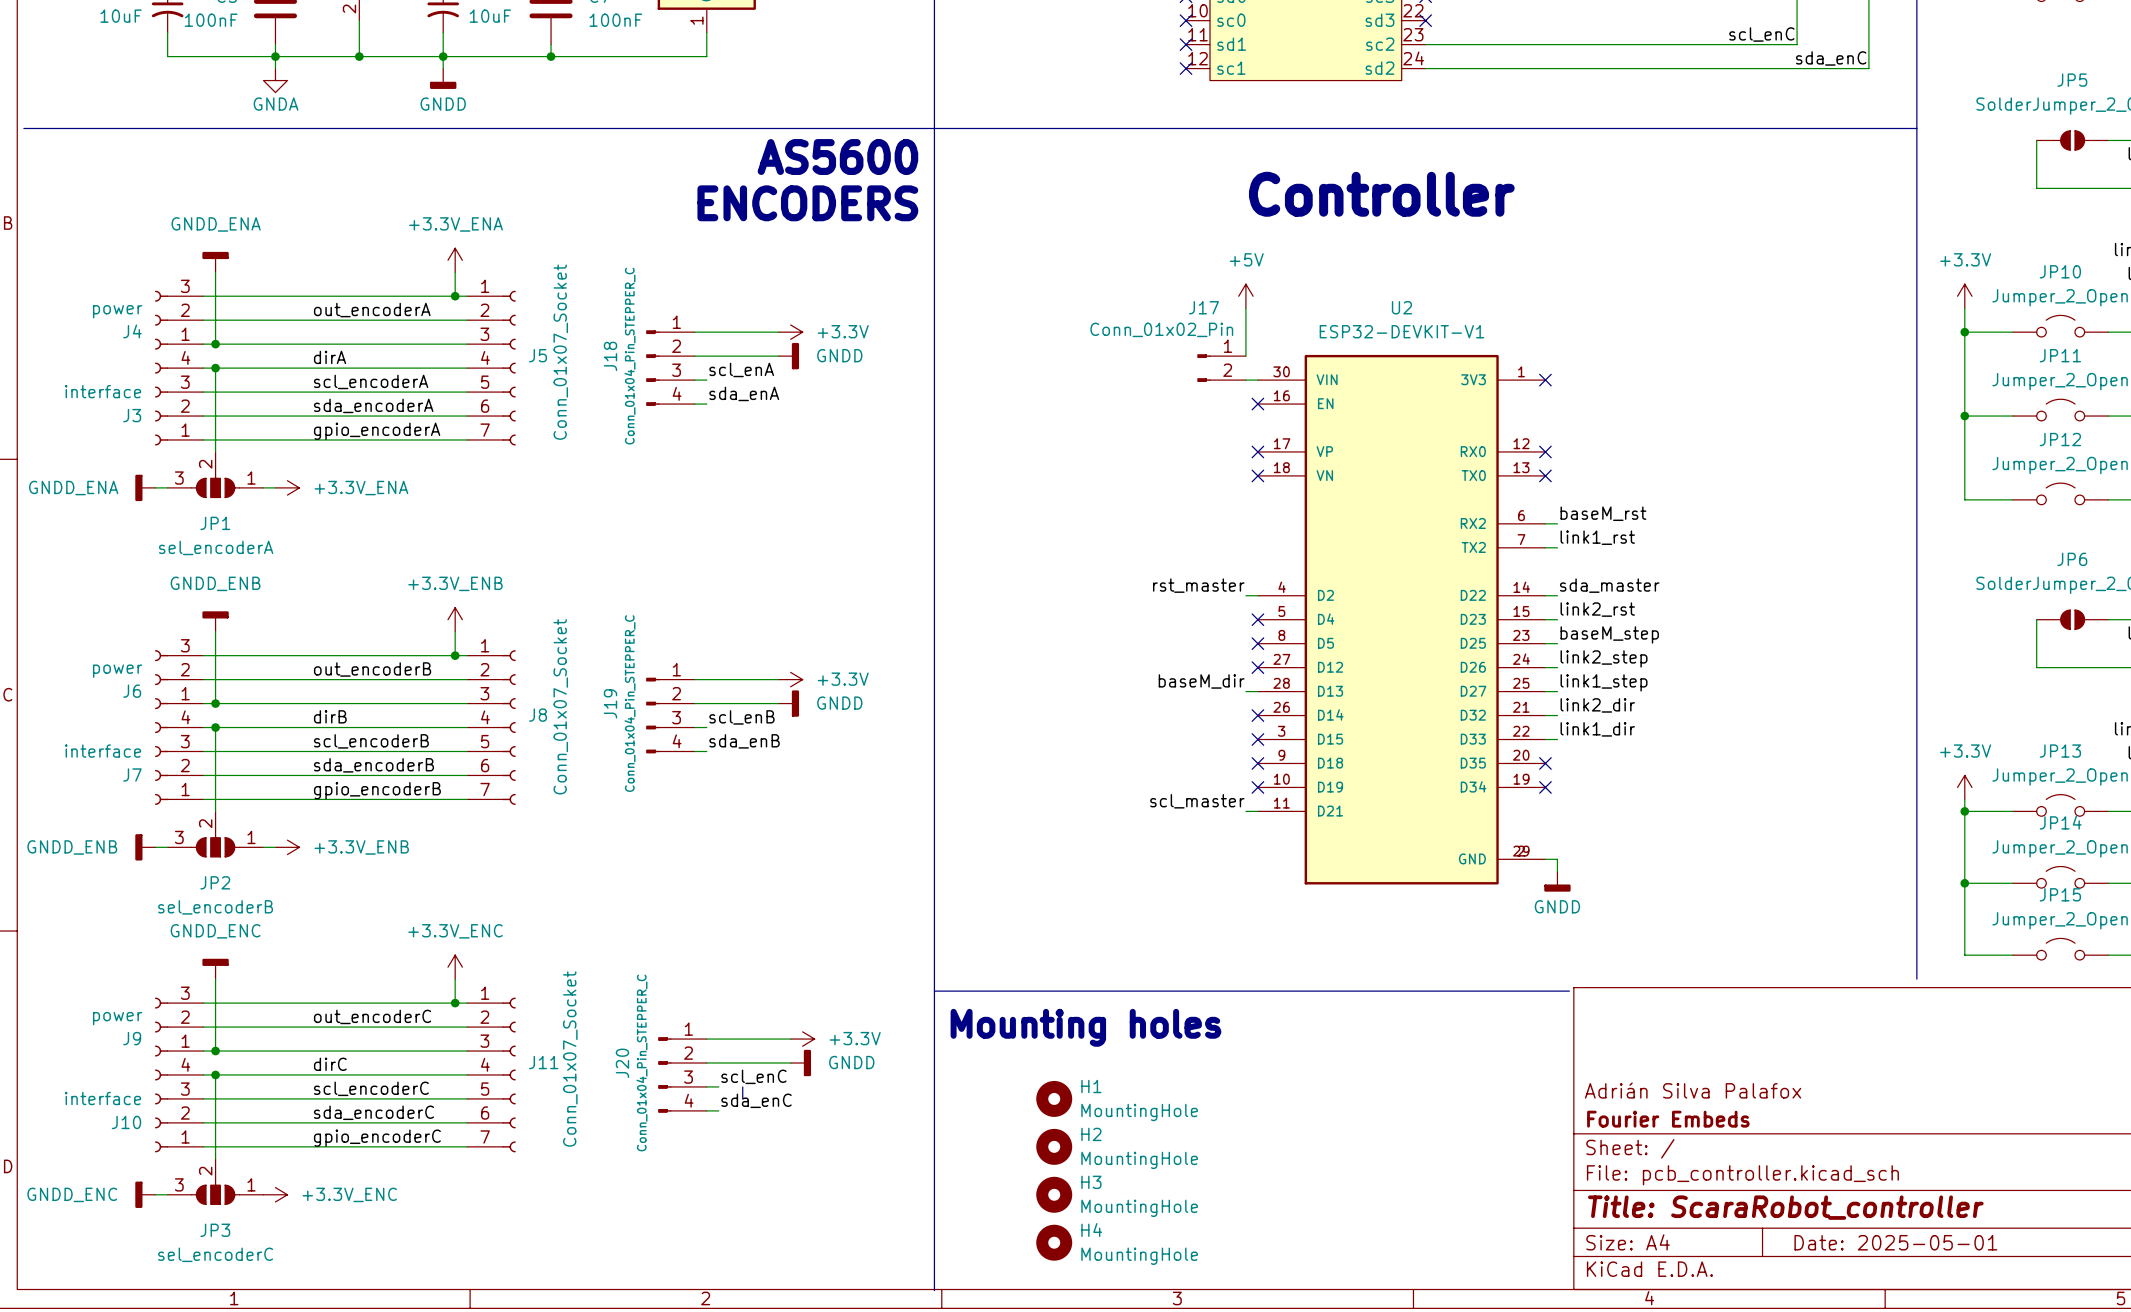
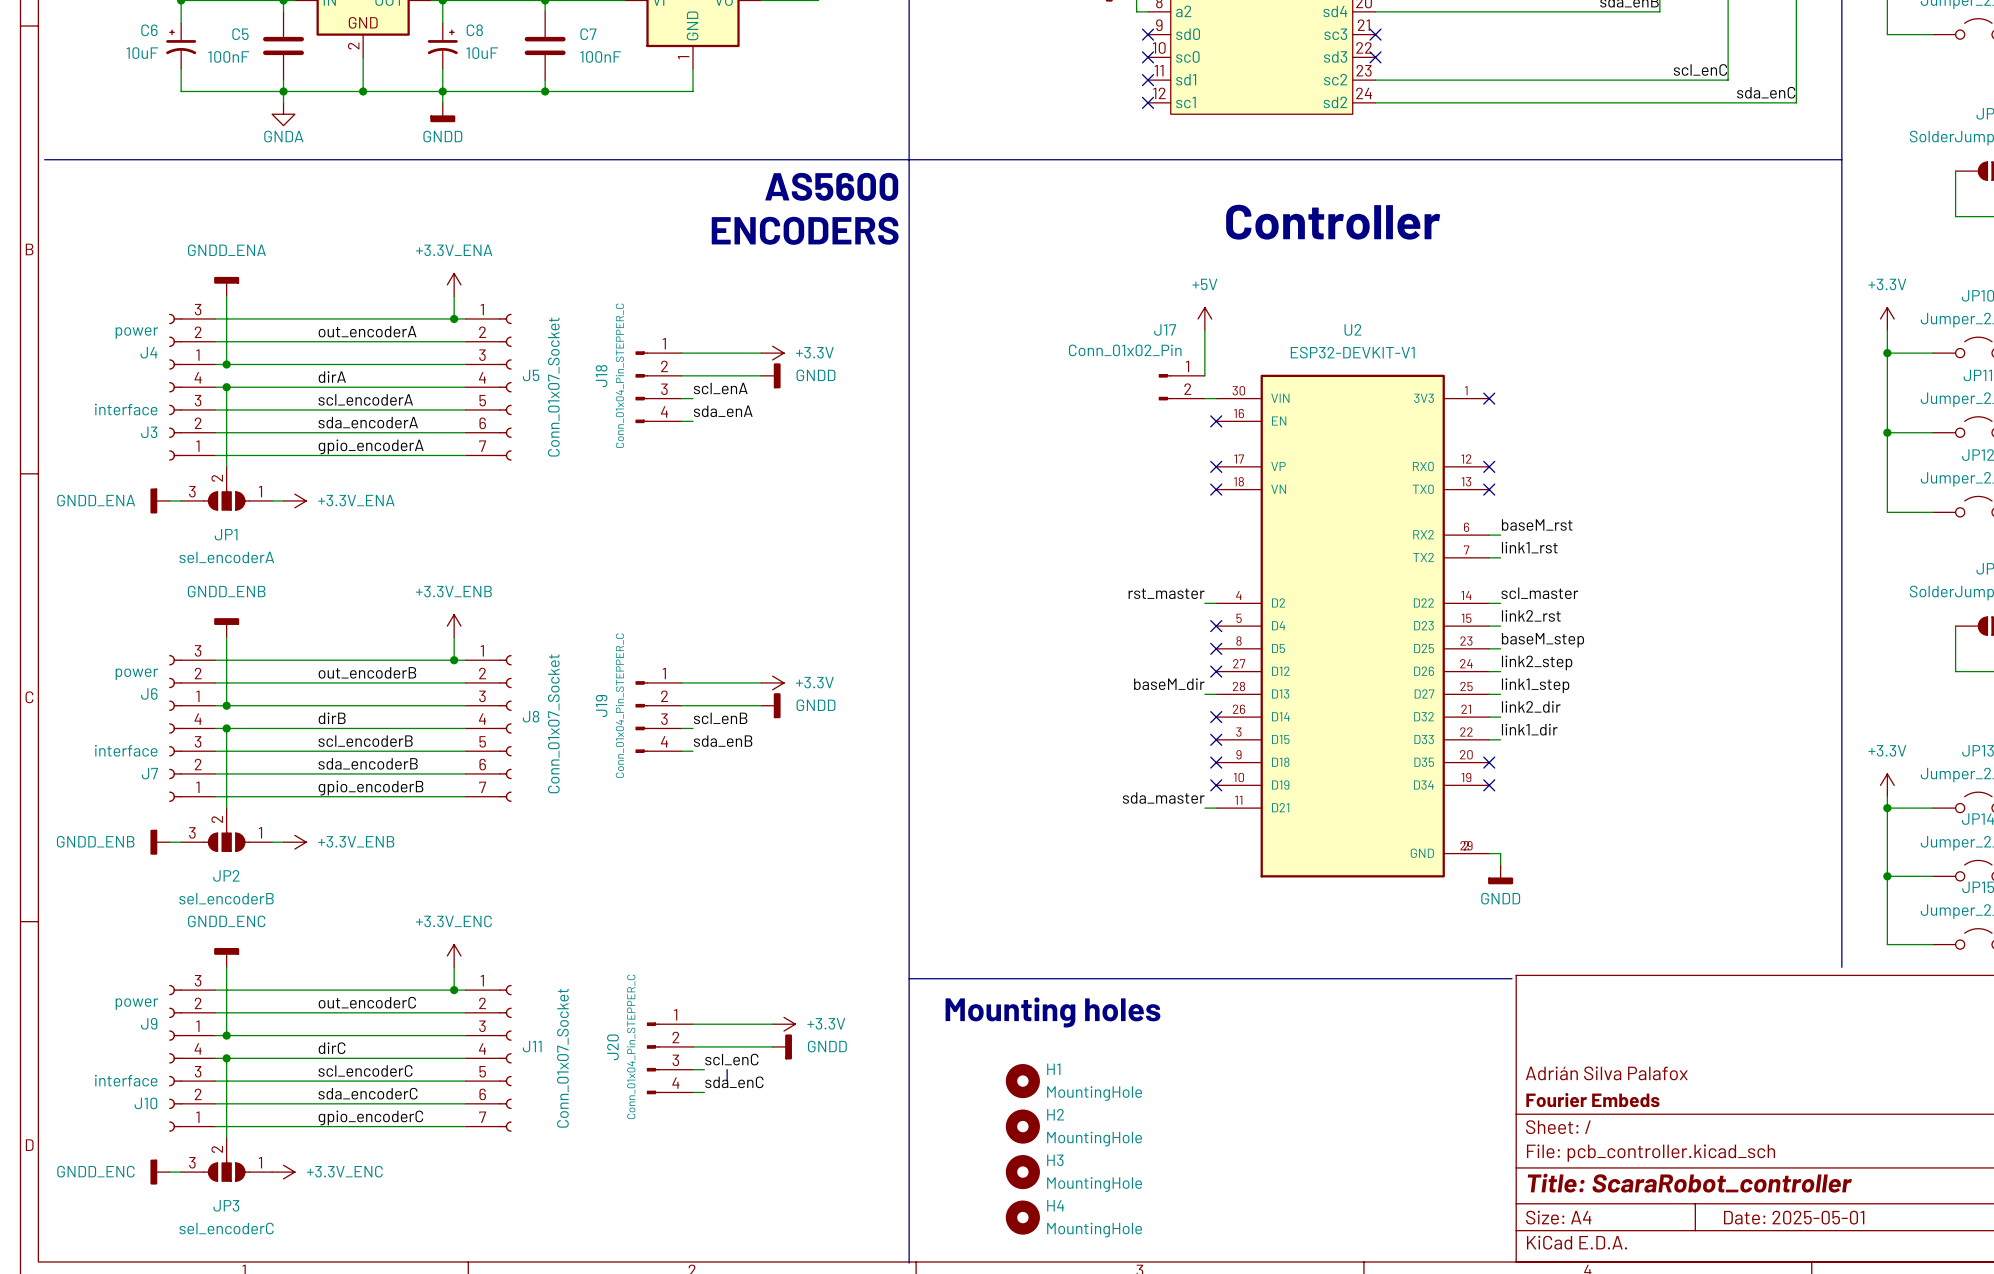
label: sda_master (1609, 585) -> scl_master (1539, 593)
label: scl_master (1197, 801) -> sda_master (1163, 798)

